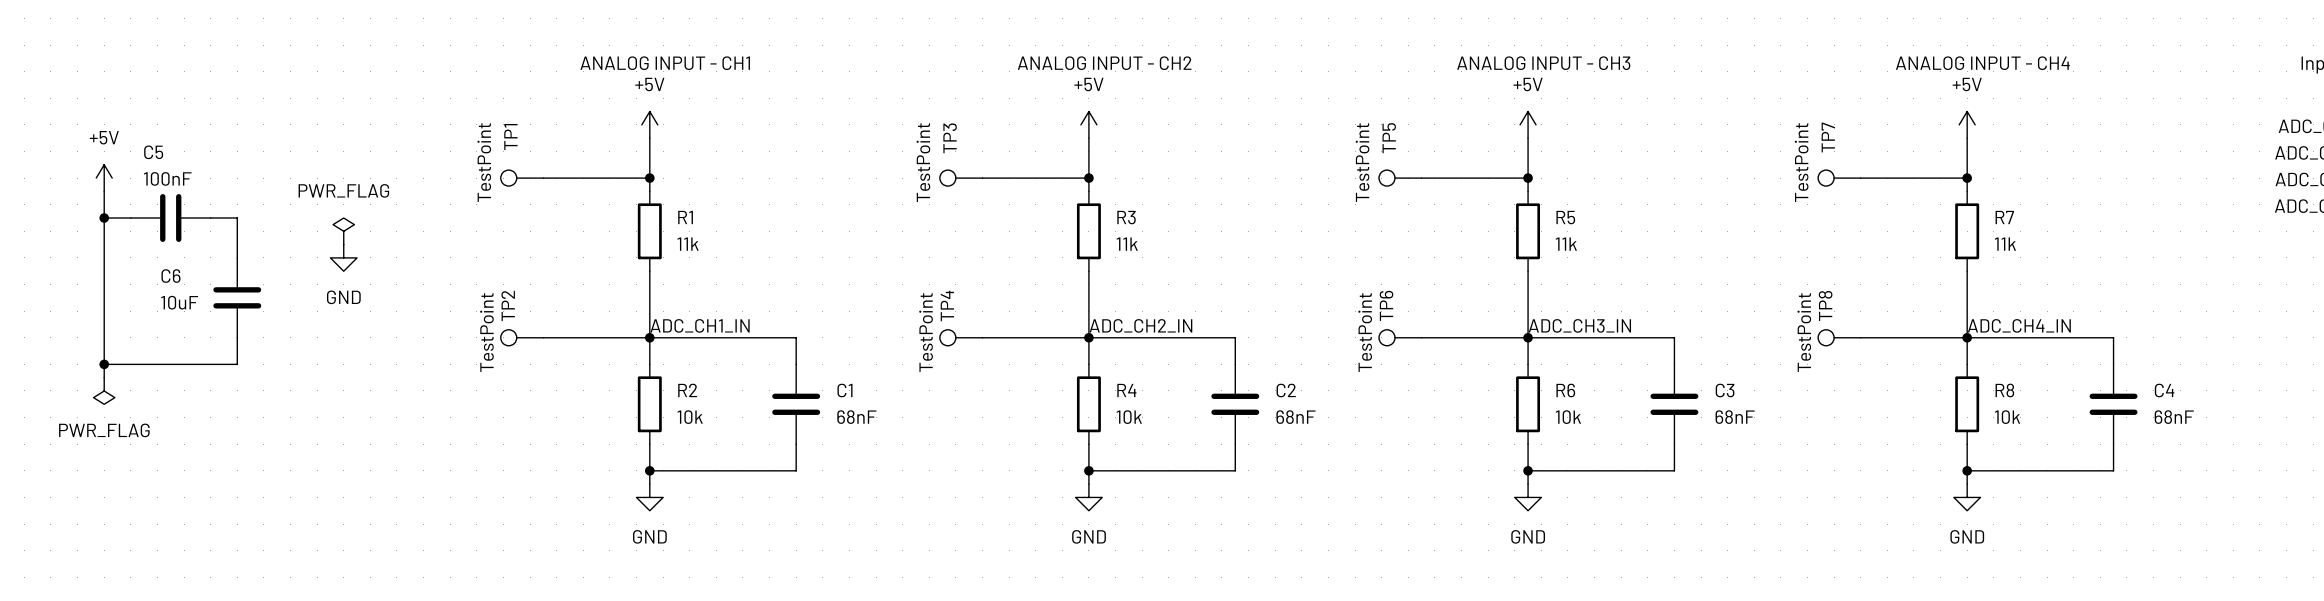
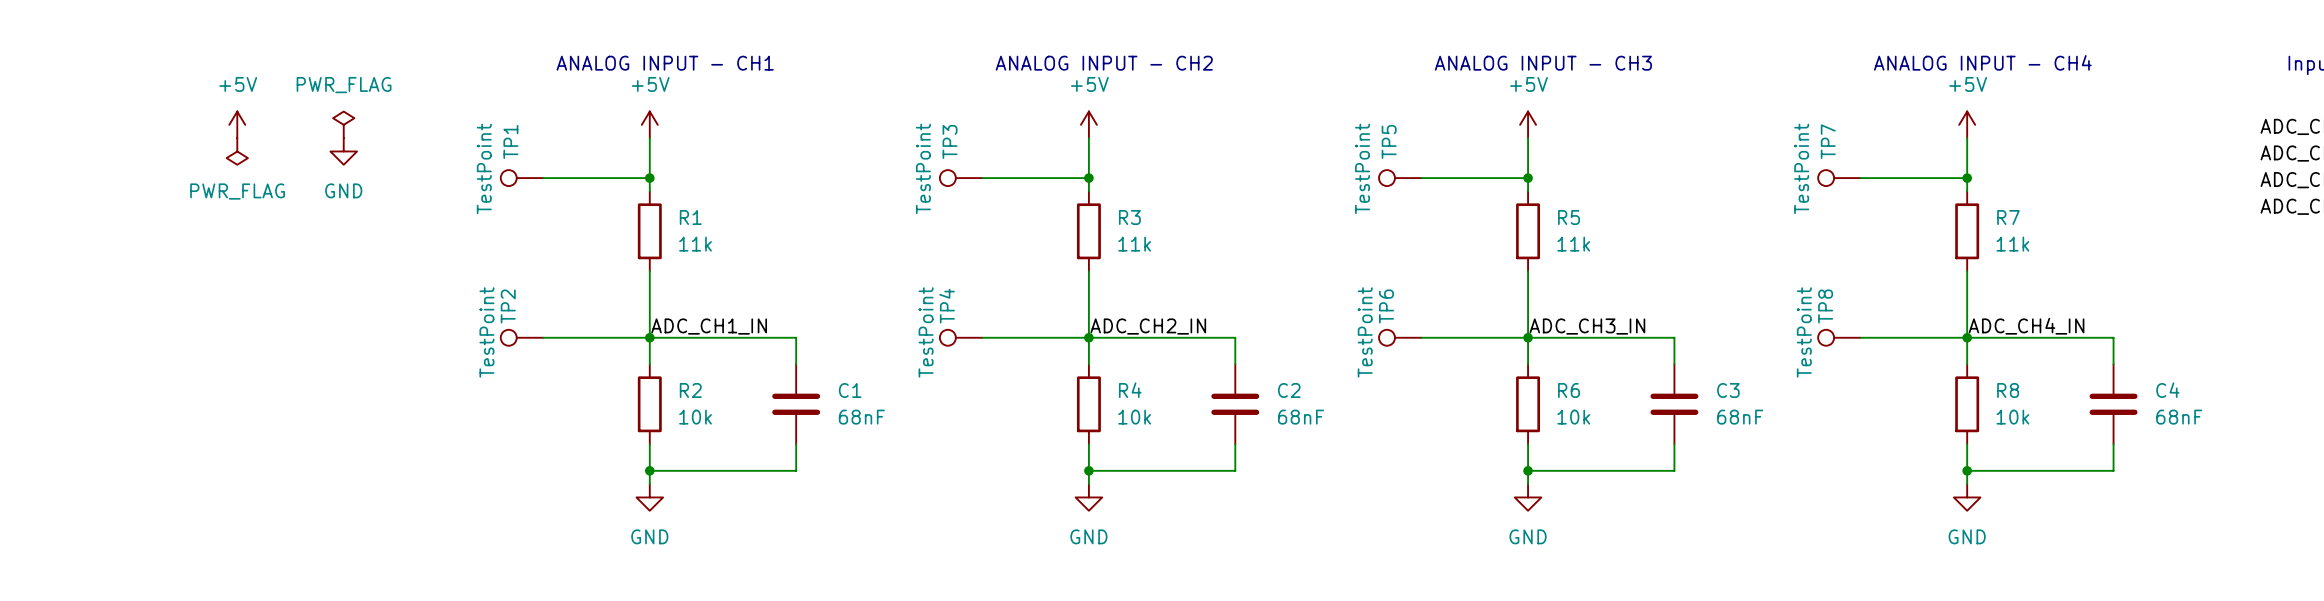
power symbol: none -> PWR_FLAG (343, 124)
power symbol: none -> PWR_FLAG (237, 151)
power symbol position: +5V (104, 178) -> +5V (237, 124)
wire: (104, 191) (104, 377) -> none
wire: (104, 218) (130, 218) -> none
junction: (104, 218) -> none
C5: 100nF (170, 218) -> none
wire: (210, 218) (237, 218) (237, 257) -> none
power symbol: PWR_FLAG (343, 231) -> none
power symbol position: GND (343, 257) -> GND (343, 151)
C6: 10uF (237, 297) -> none
wire: (237, 337) (237, 364) (104, 364) -> none
junction: (104, 364) -> none
power symbol: PWR_FLAG (104, 390) -> none

